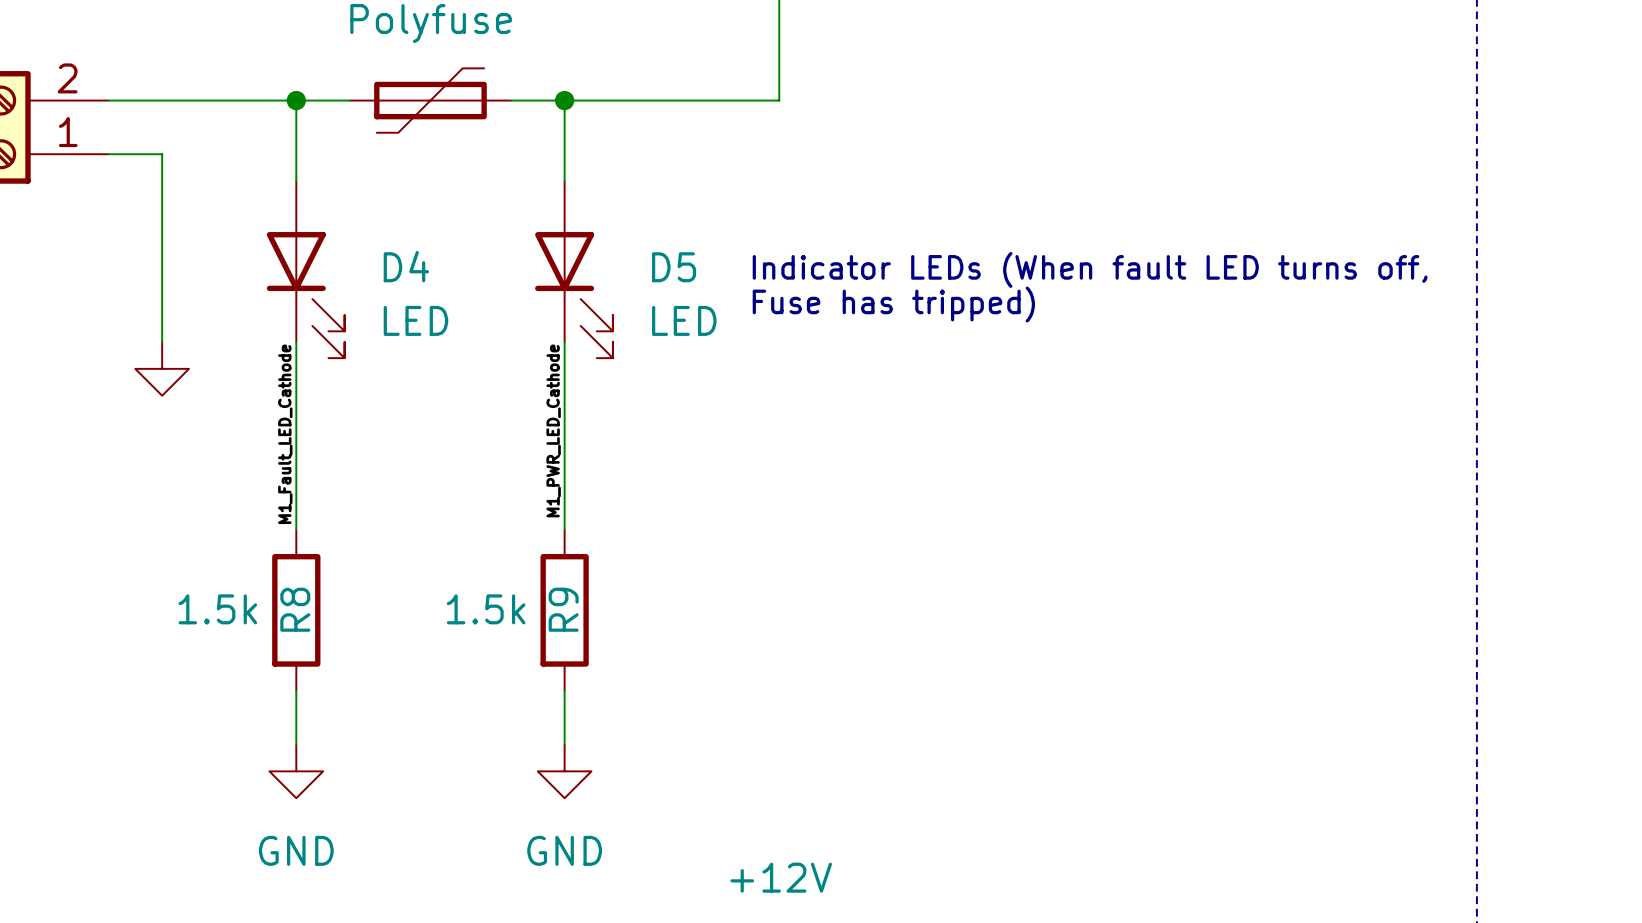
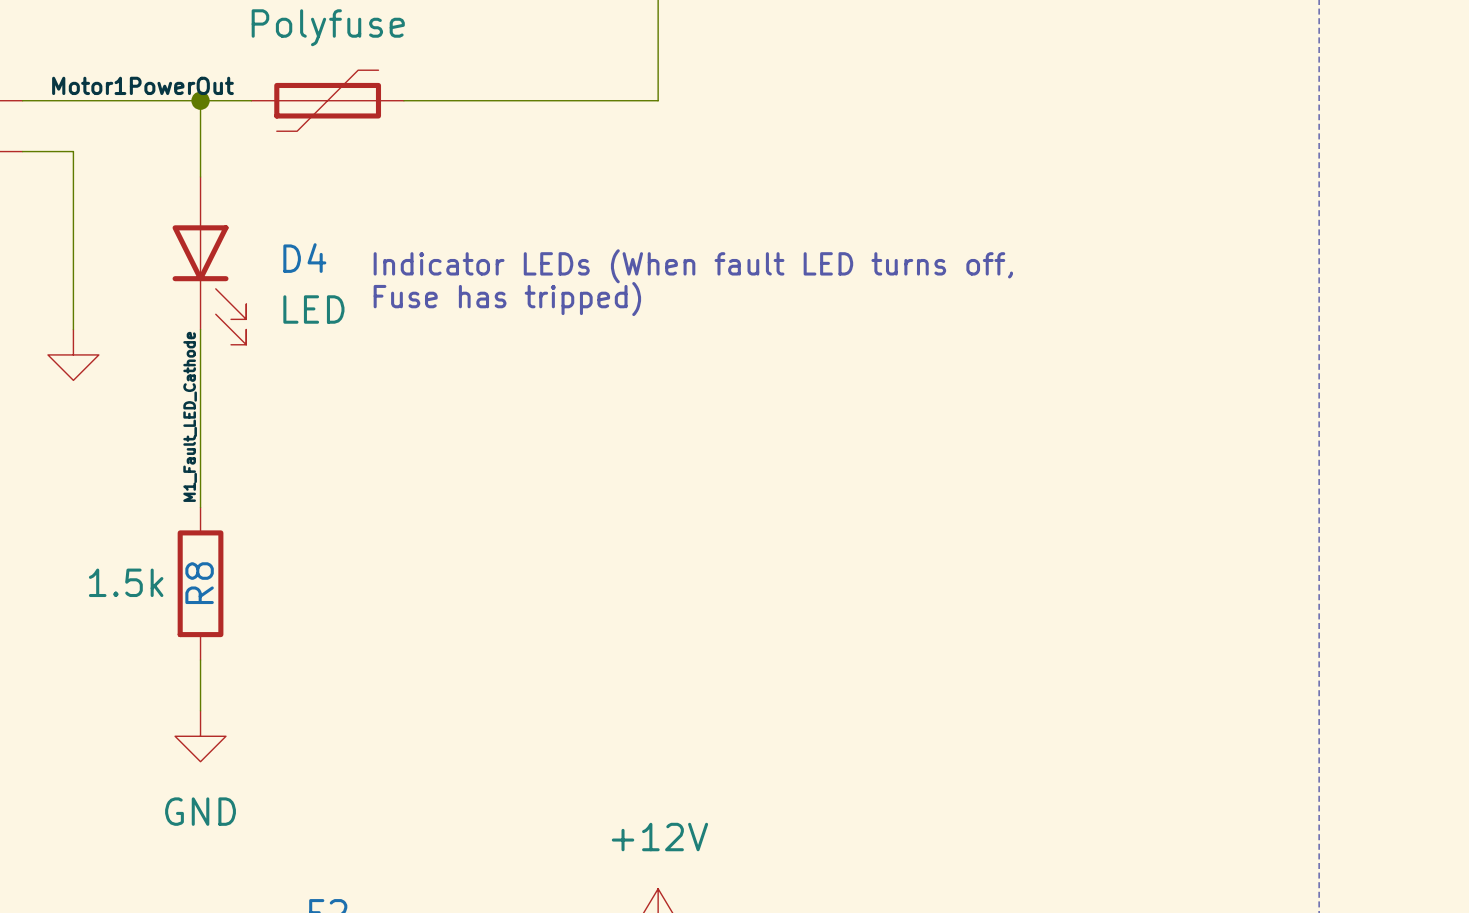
label: none -> Motor1PowerOut (142, 85)
wire: (564, 100) (564, 181) -> none
junction: (564, 100) -> none
D5: LED (574, 269) -> none
text position: Indicator LEDs (When fault LED turns off, (1090, 269) -> Indicator LEDs (When fault LED turns off, (693, 266)
text position: Fuse has tripped) (893, 304) -> Fuse has tripped) (507, 299)
wire: (564, 342) (564, 529) -> none
label: M1_PWR_LED_Cathode (553, 430) -> none
R9: 1.5k (564, 610) -> none
wire: (564, 690) (564, 744) -> none
power symbol: GND (564, 771) -> none

